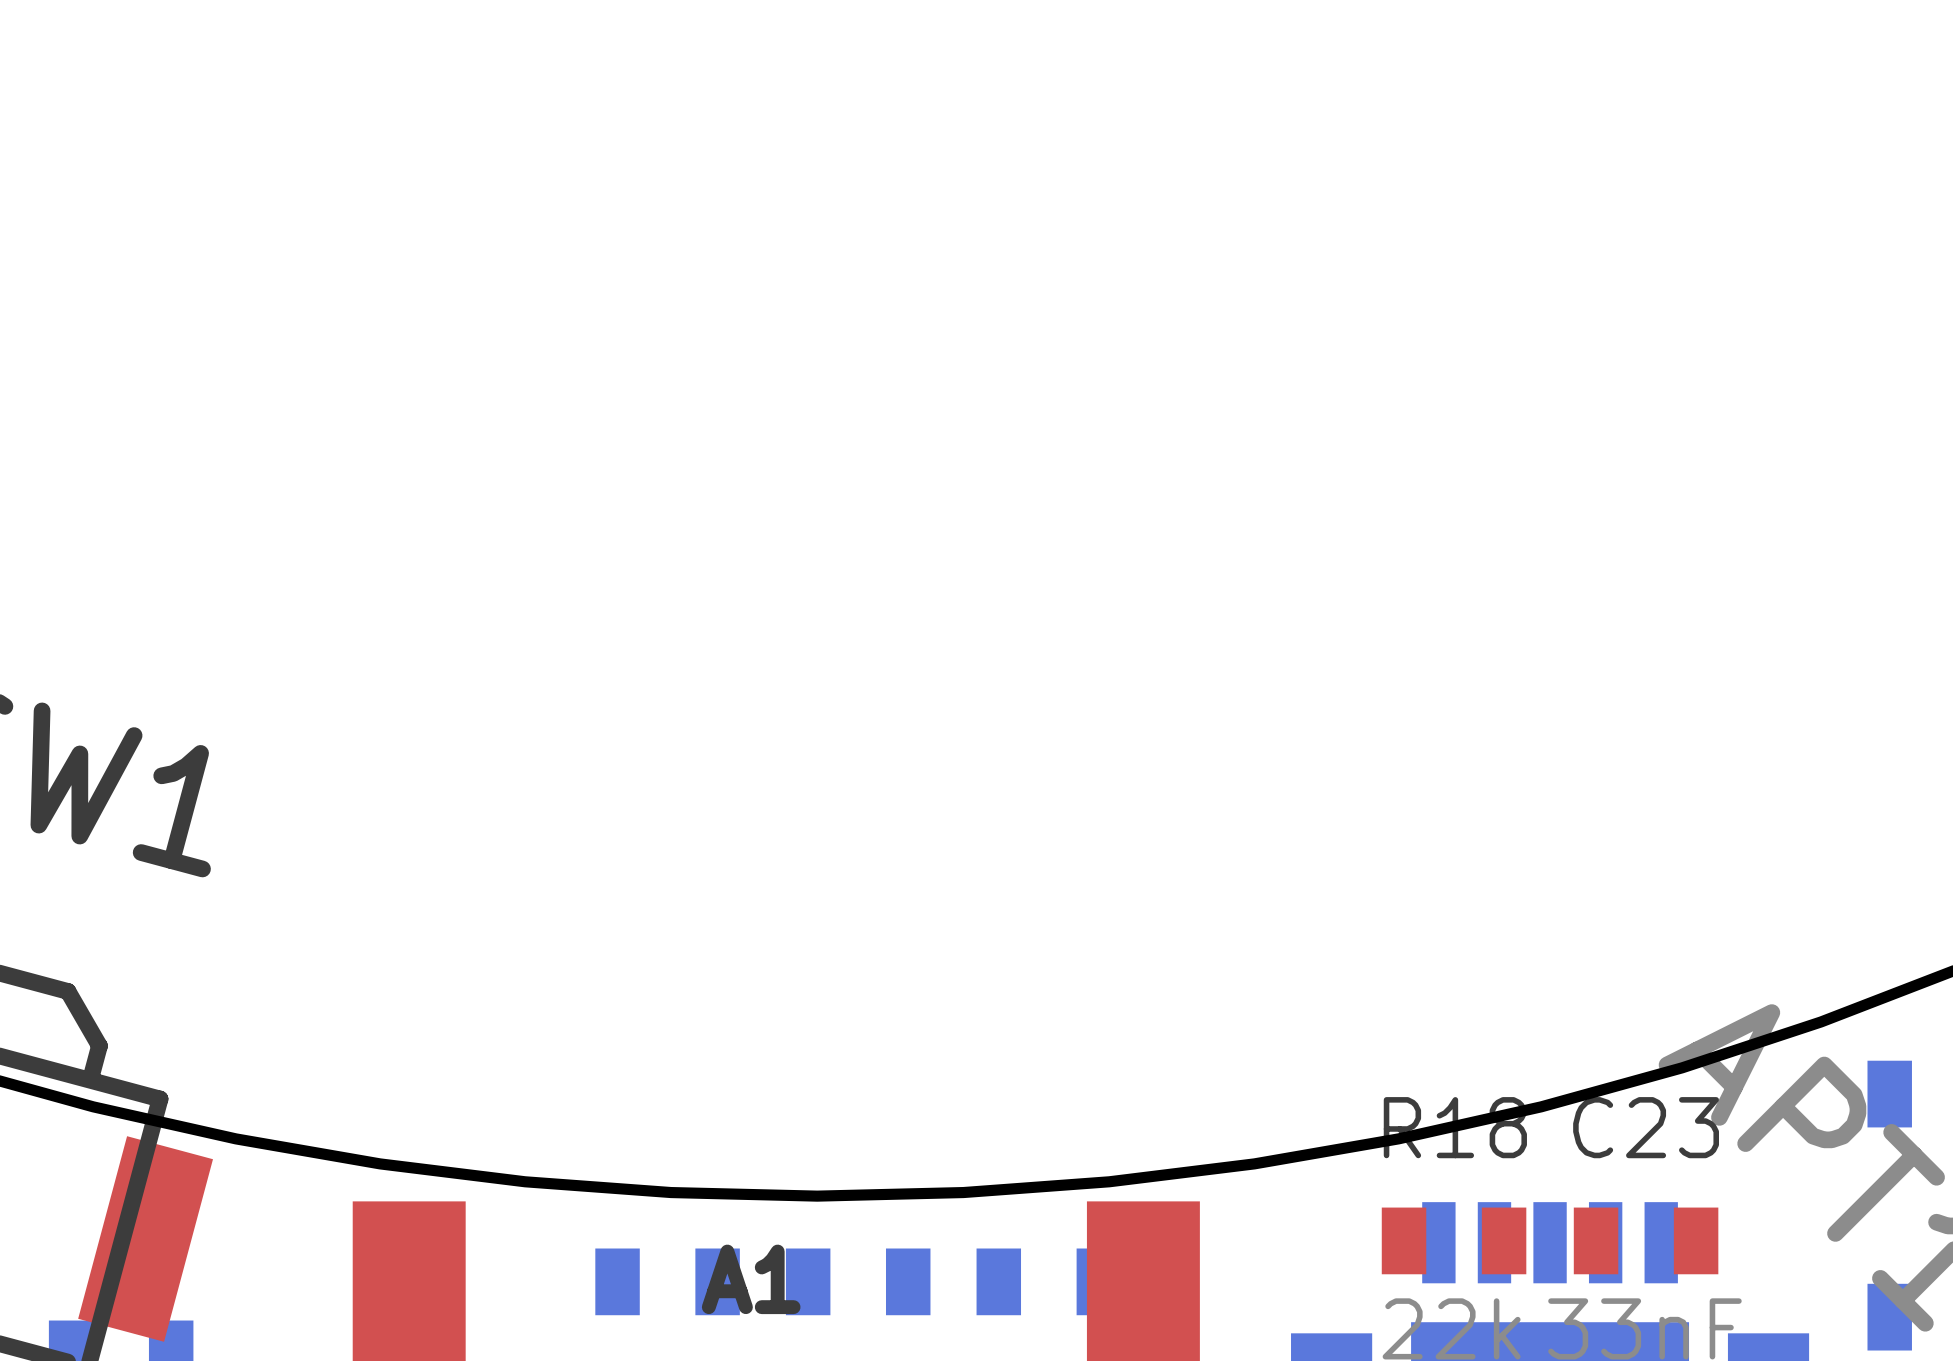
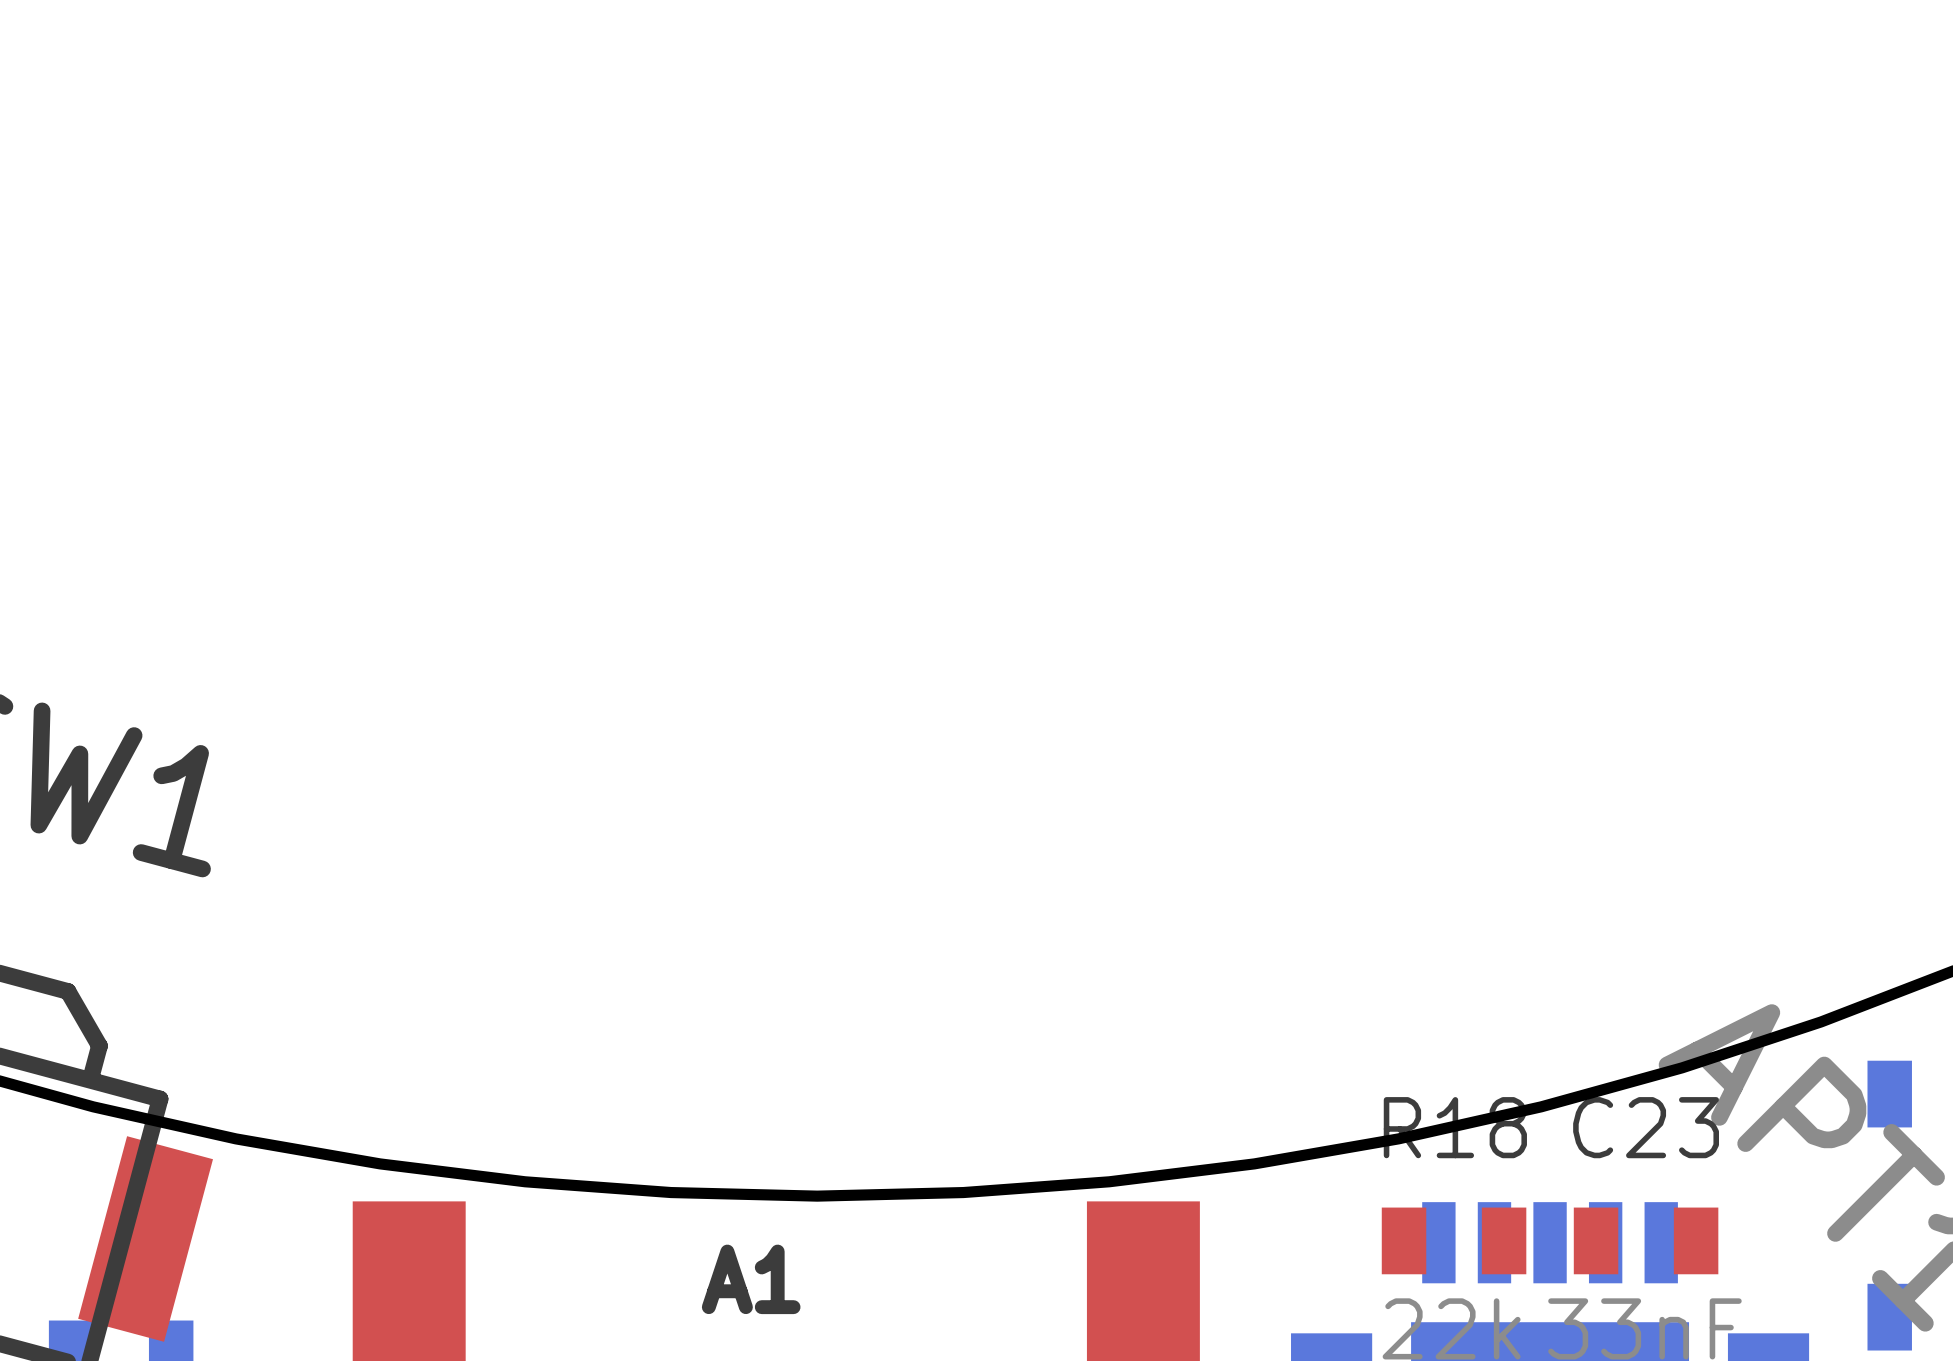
part: (667, 1281) -> none
part: (858, 1281) -> none
part: (1048, 1281) -> none

